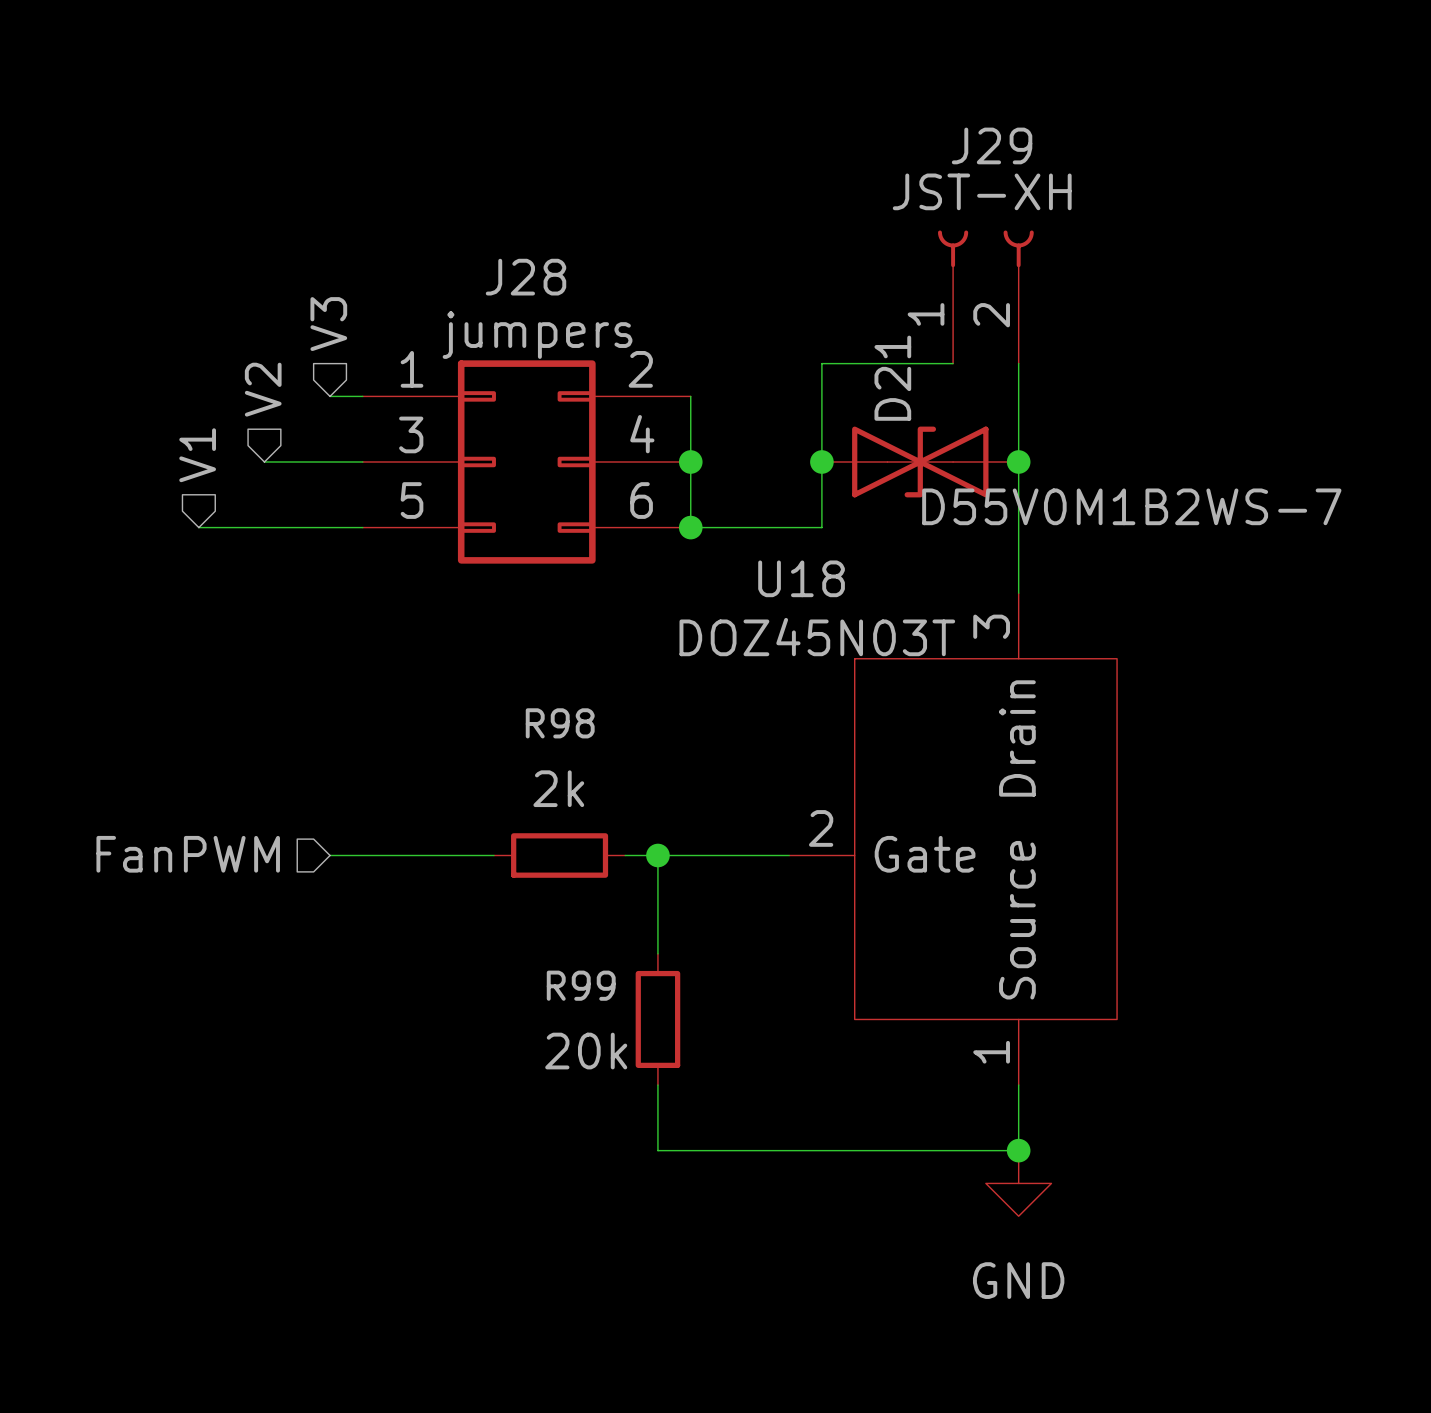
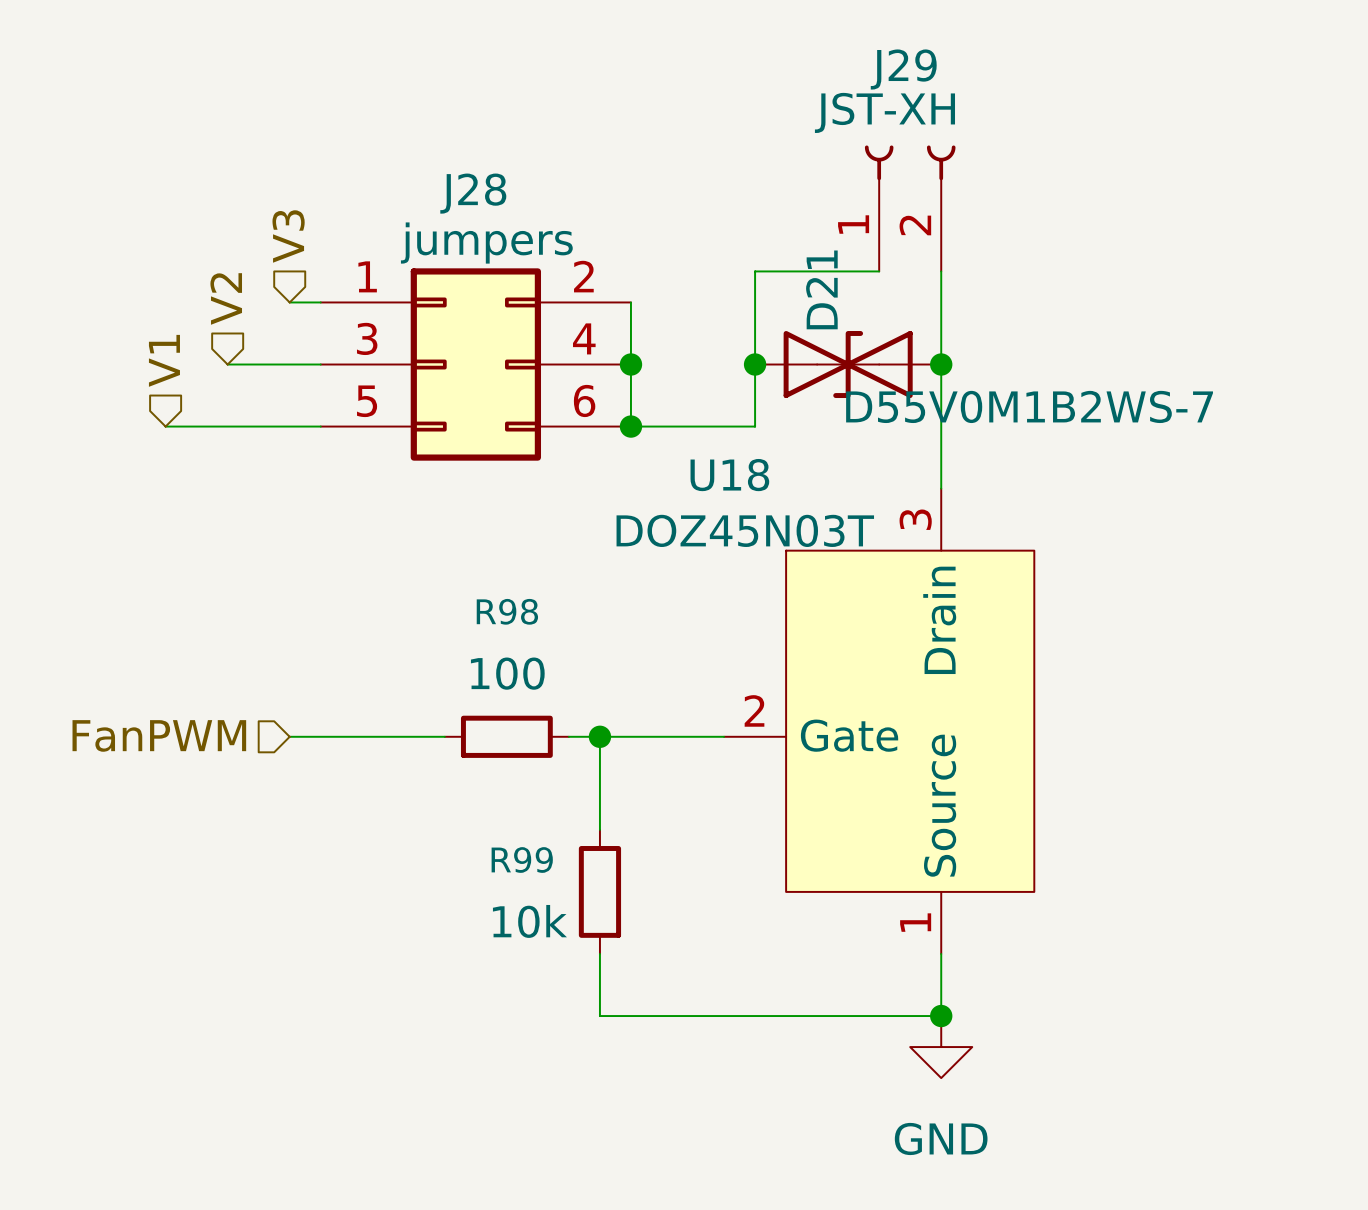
R98 value: 2k (558, 788) -> 100 (507, 673)
R99 value: 20k (586, 1051) -> 10k (529, 921)

